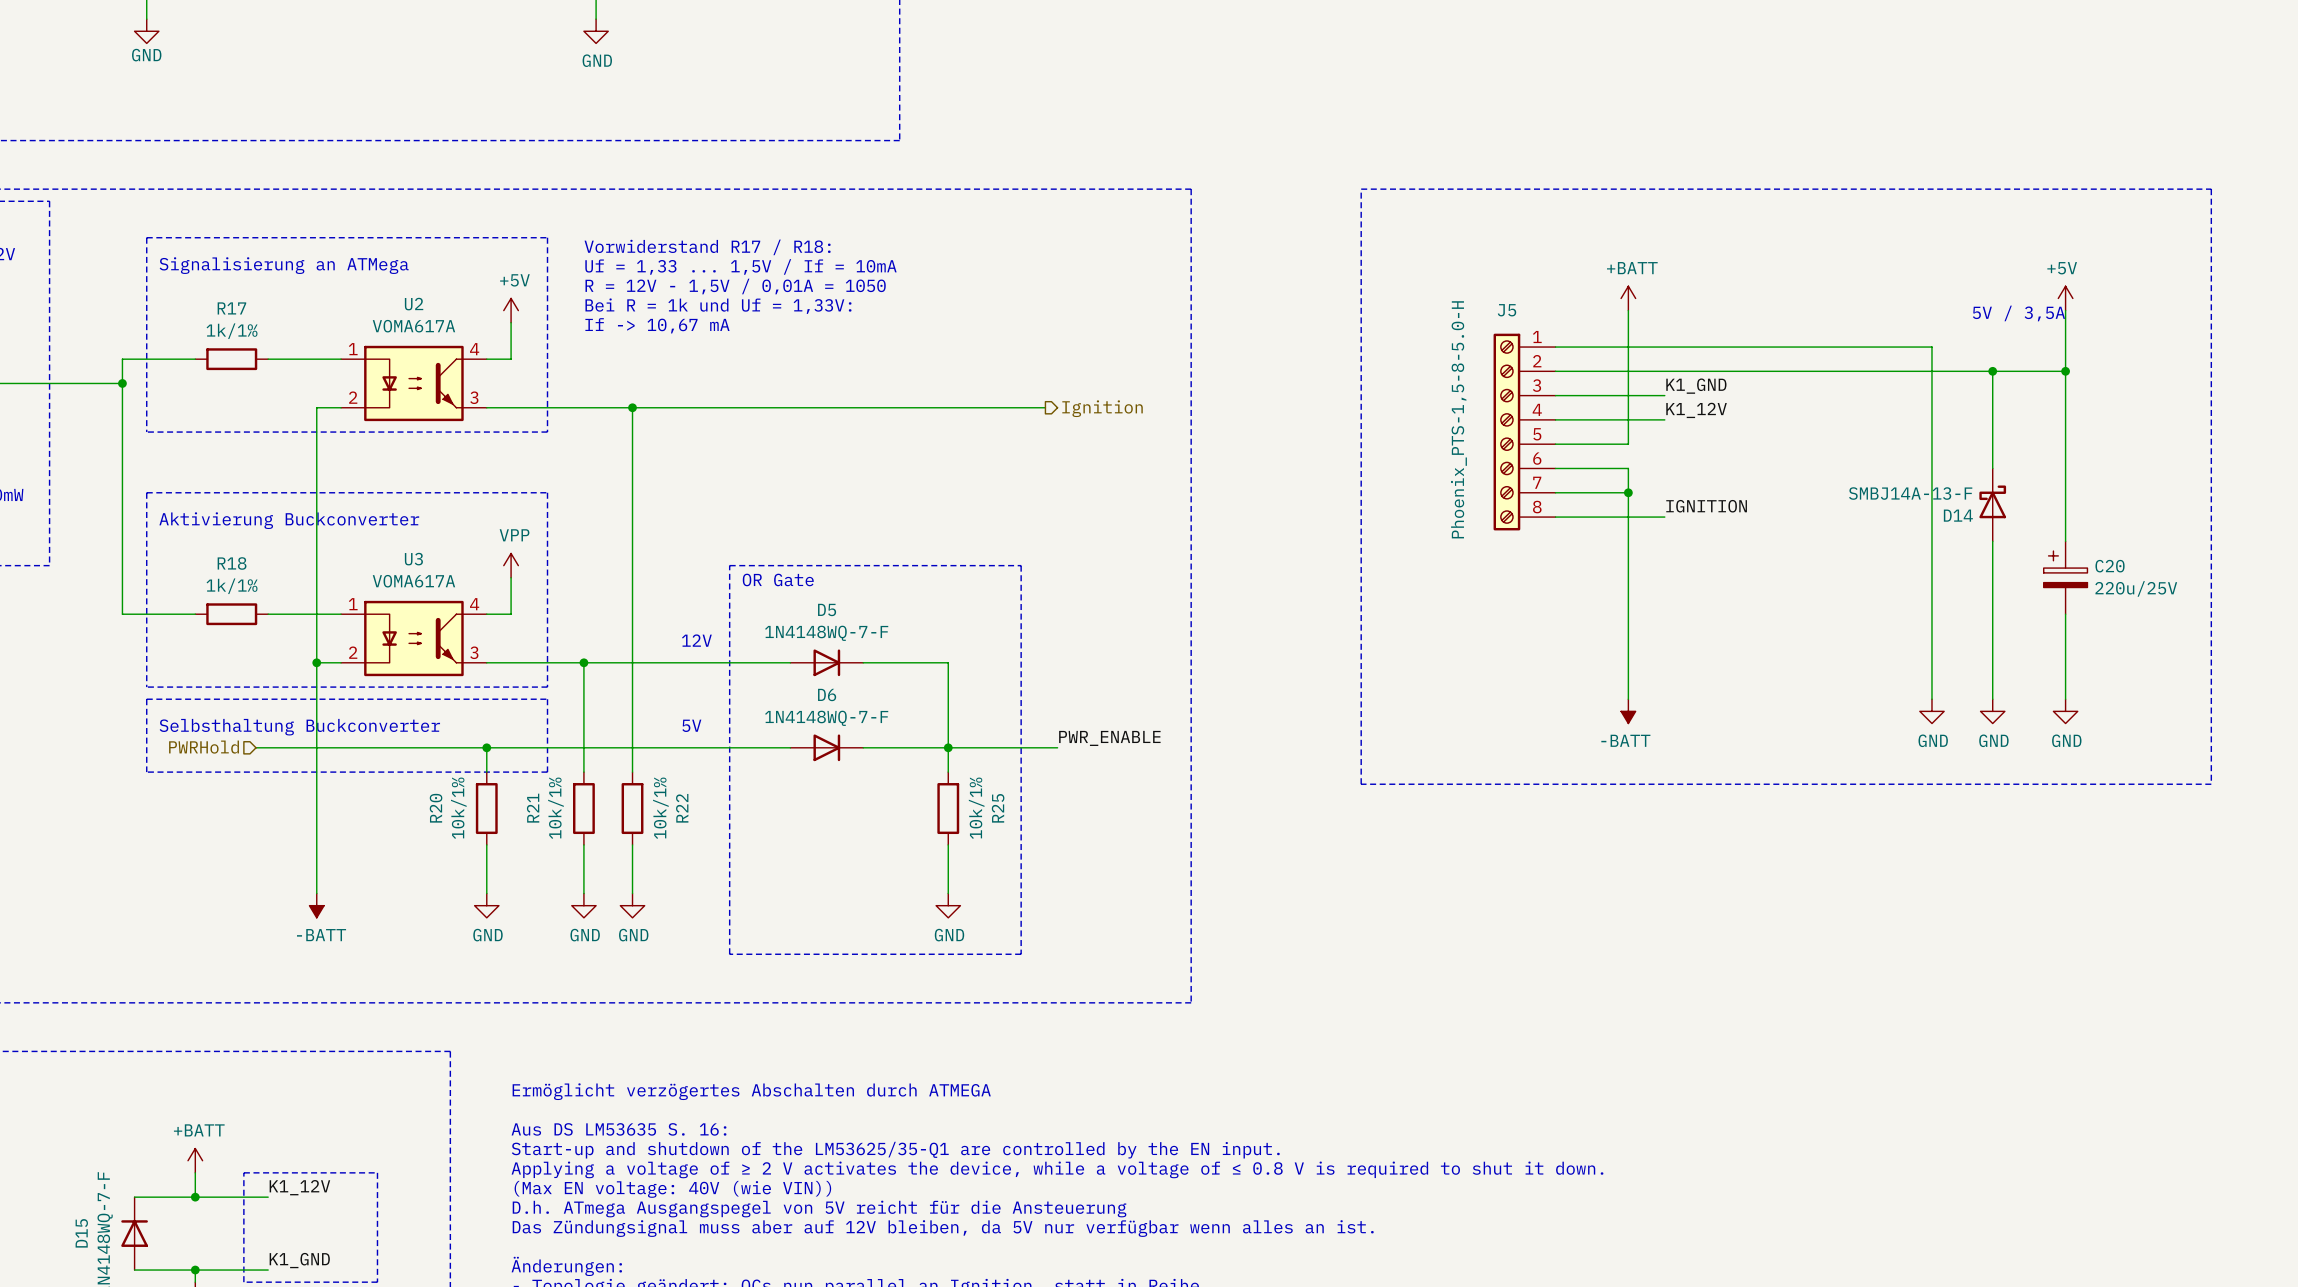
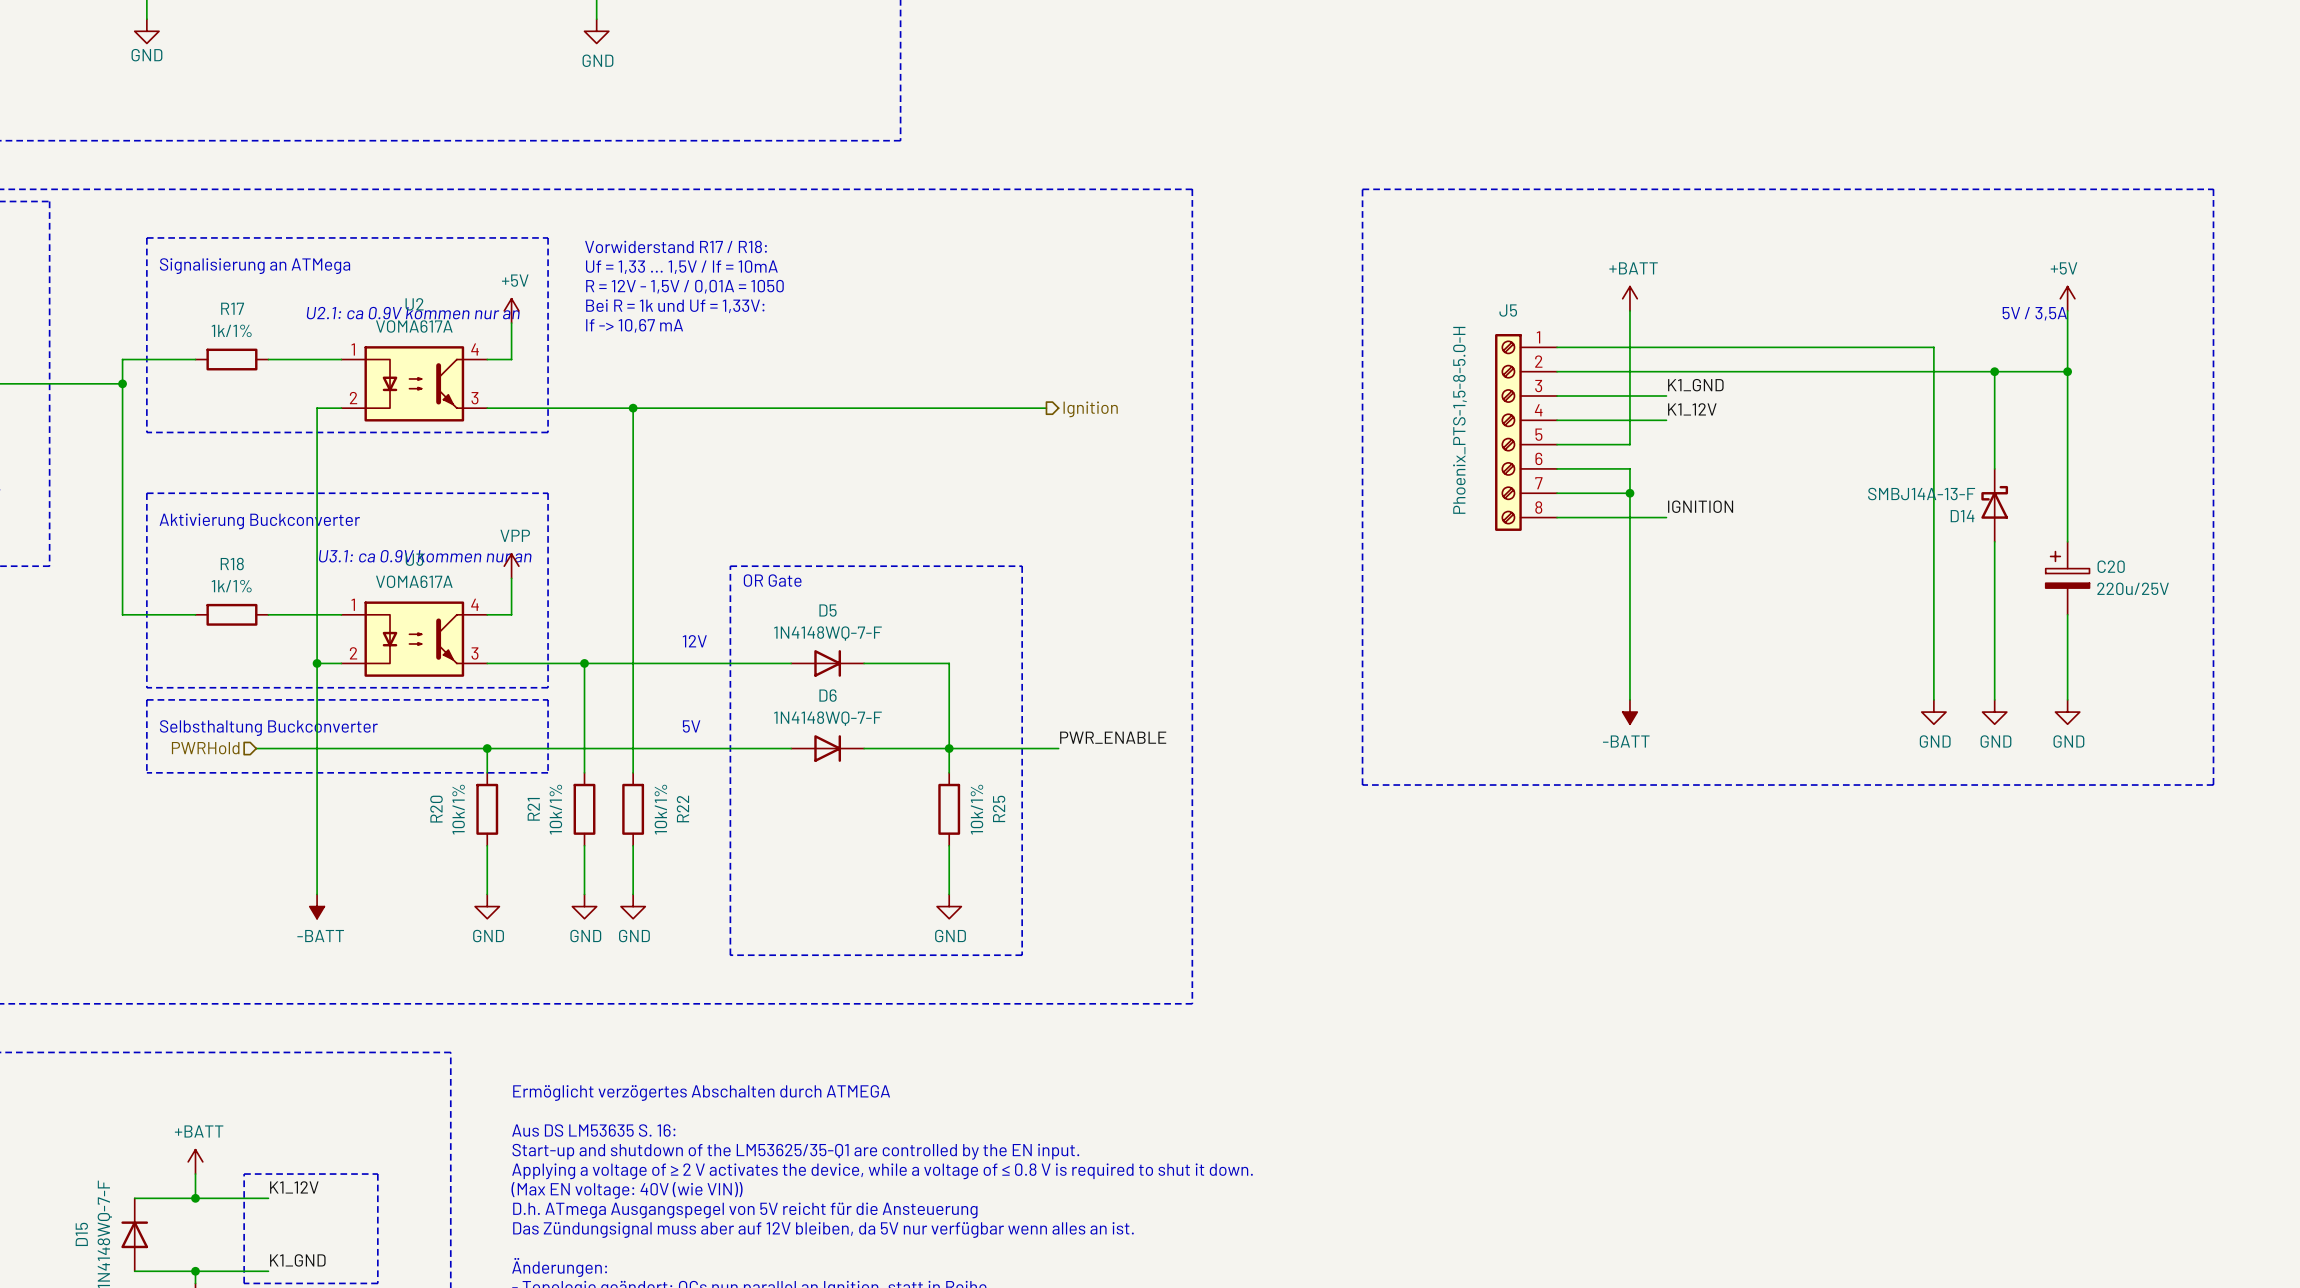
text: none -> U2.1: ca 0.9V kommen nur an (413, 313)
text: none -> U3.1: ca 0.9V kommen nur an (425, 556)

